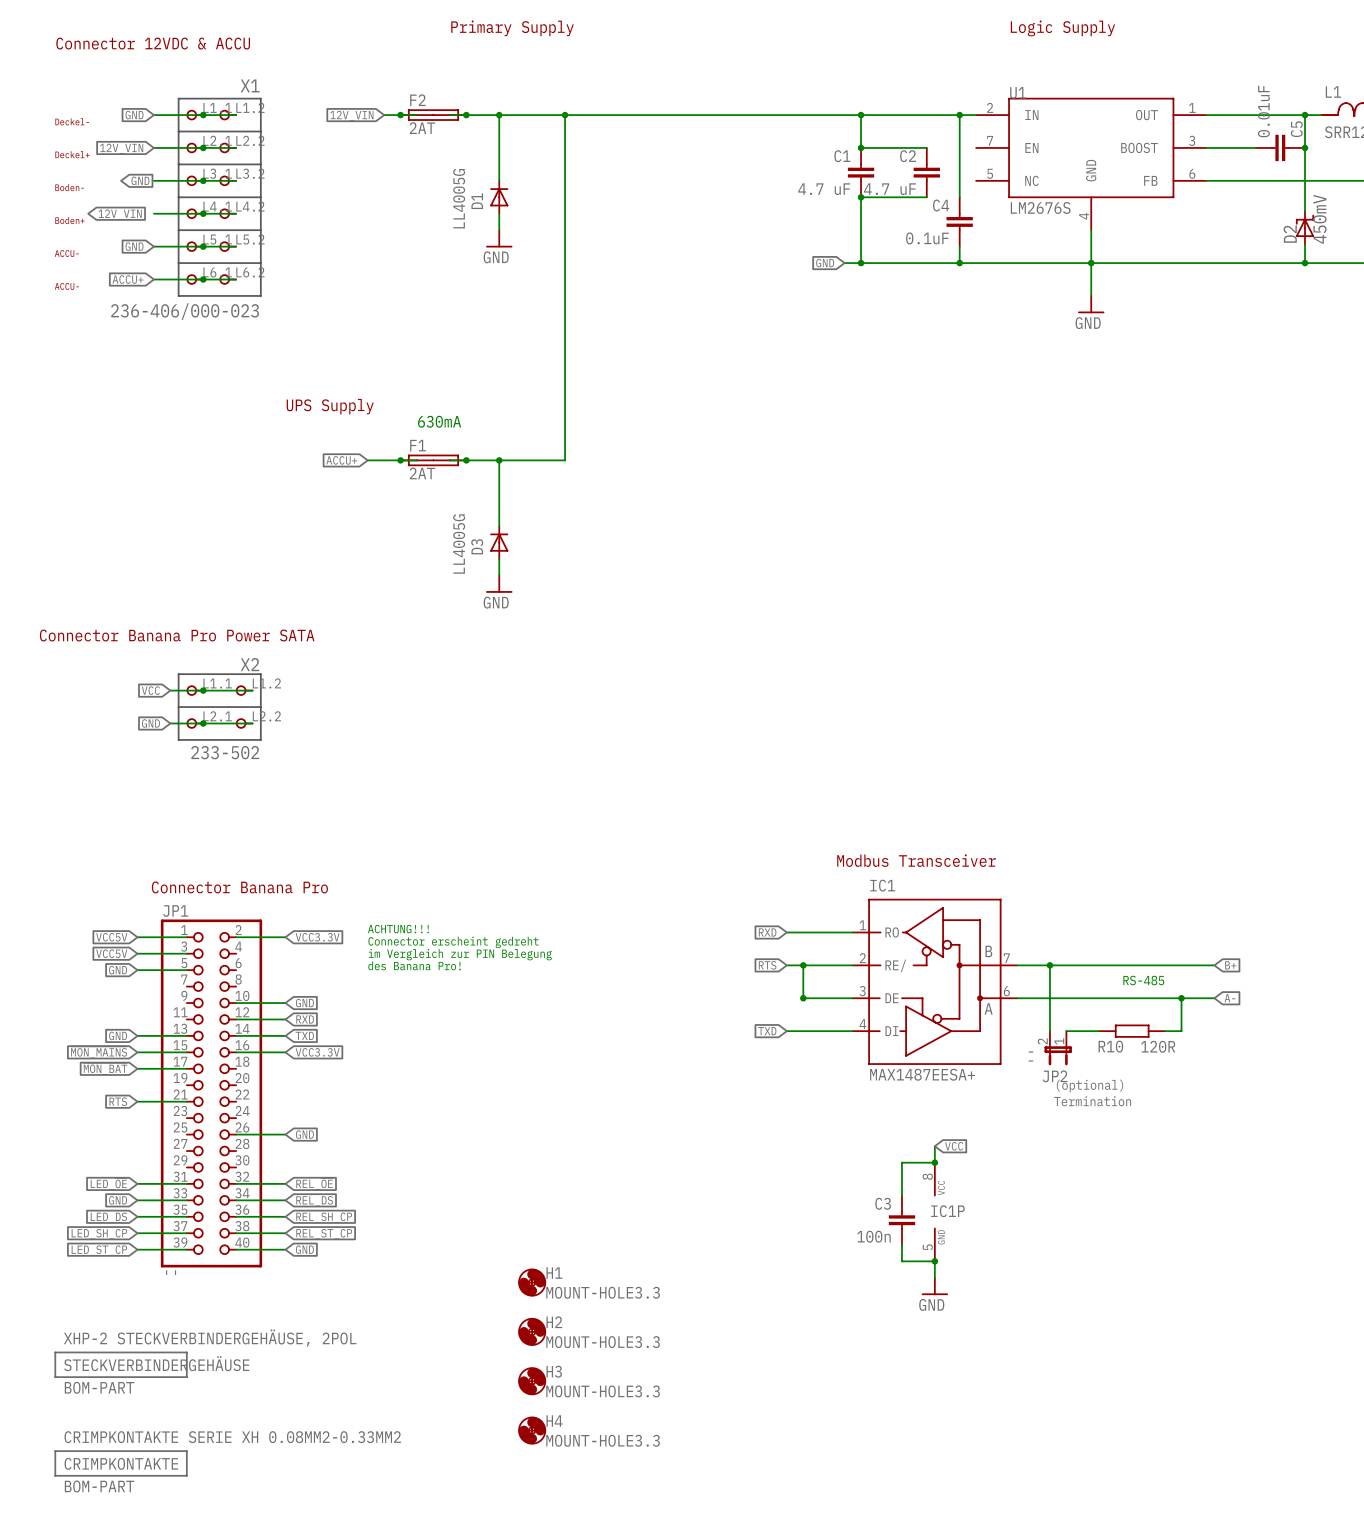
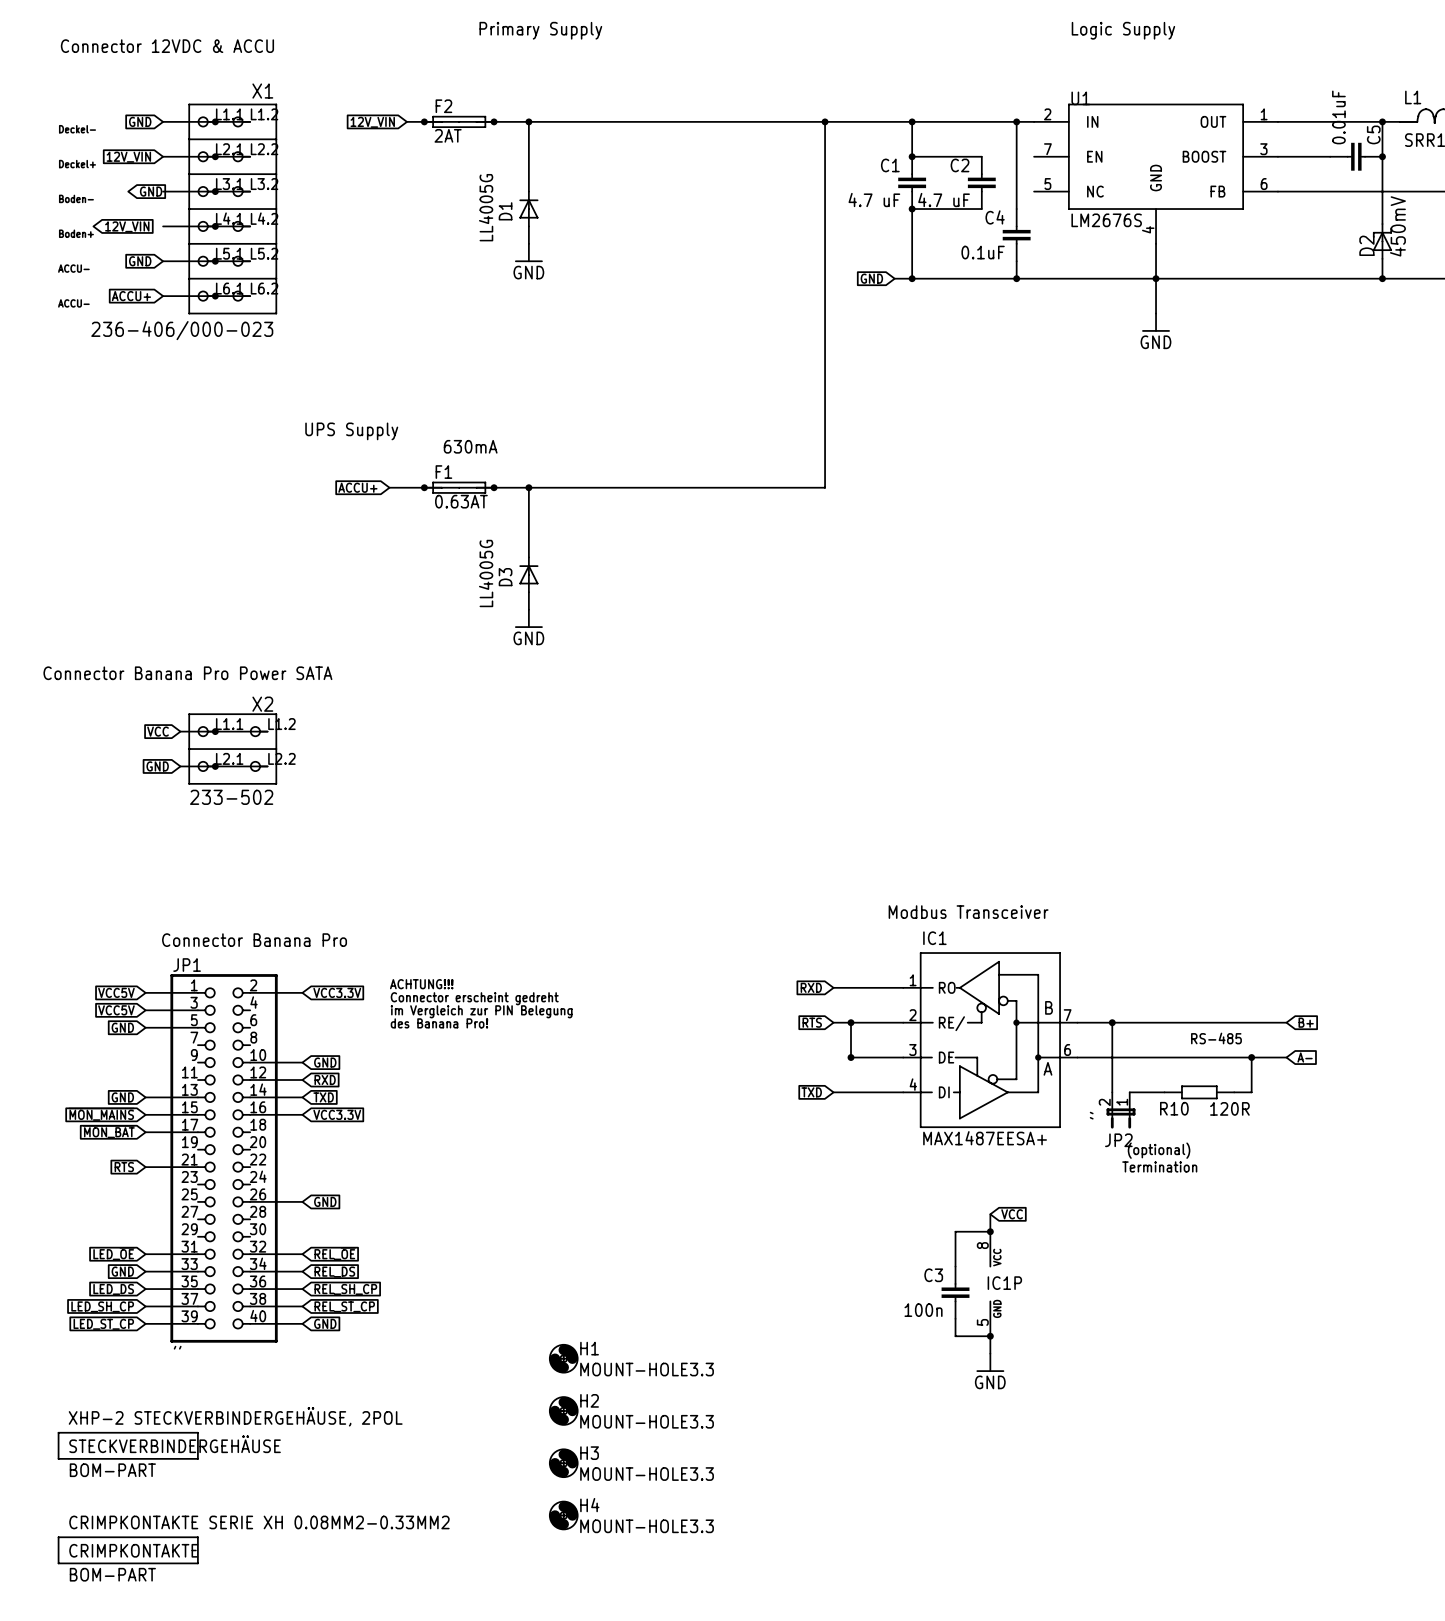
wire: (565, 115) (565, 460) -> (825, 121) (825, 487) (598, 487)
junction: (565, 115) -> none
junction: none -> (825, 121)
F1 value: 2AT (422, 473) -> 0.63AT (461, 501)

